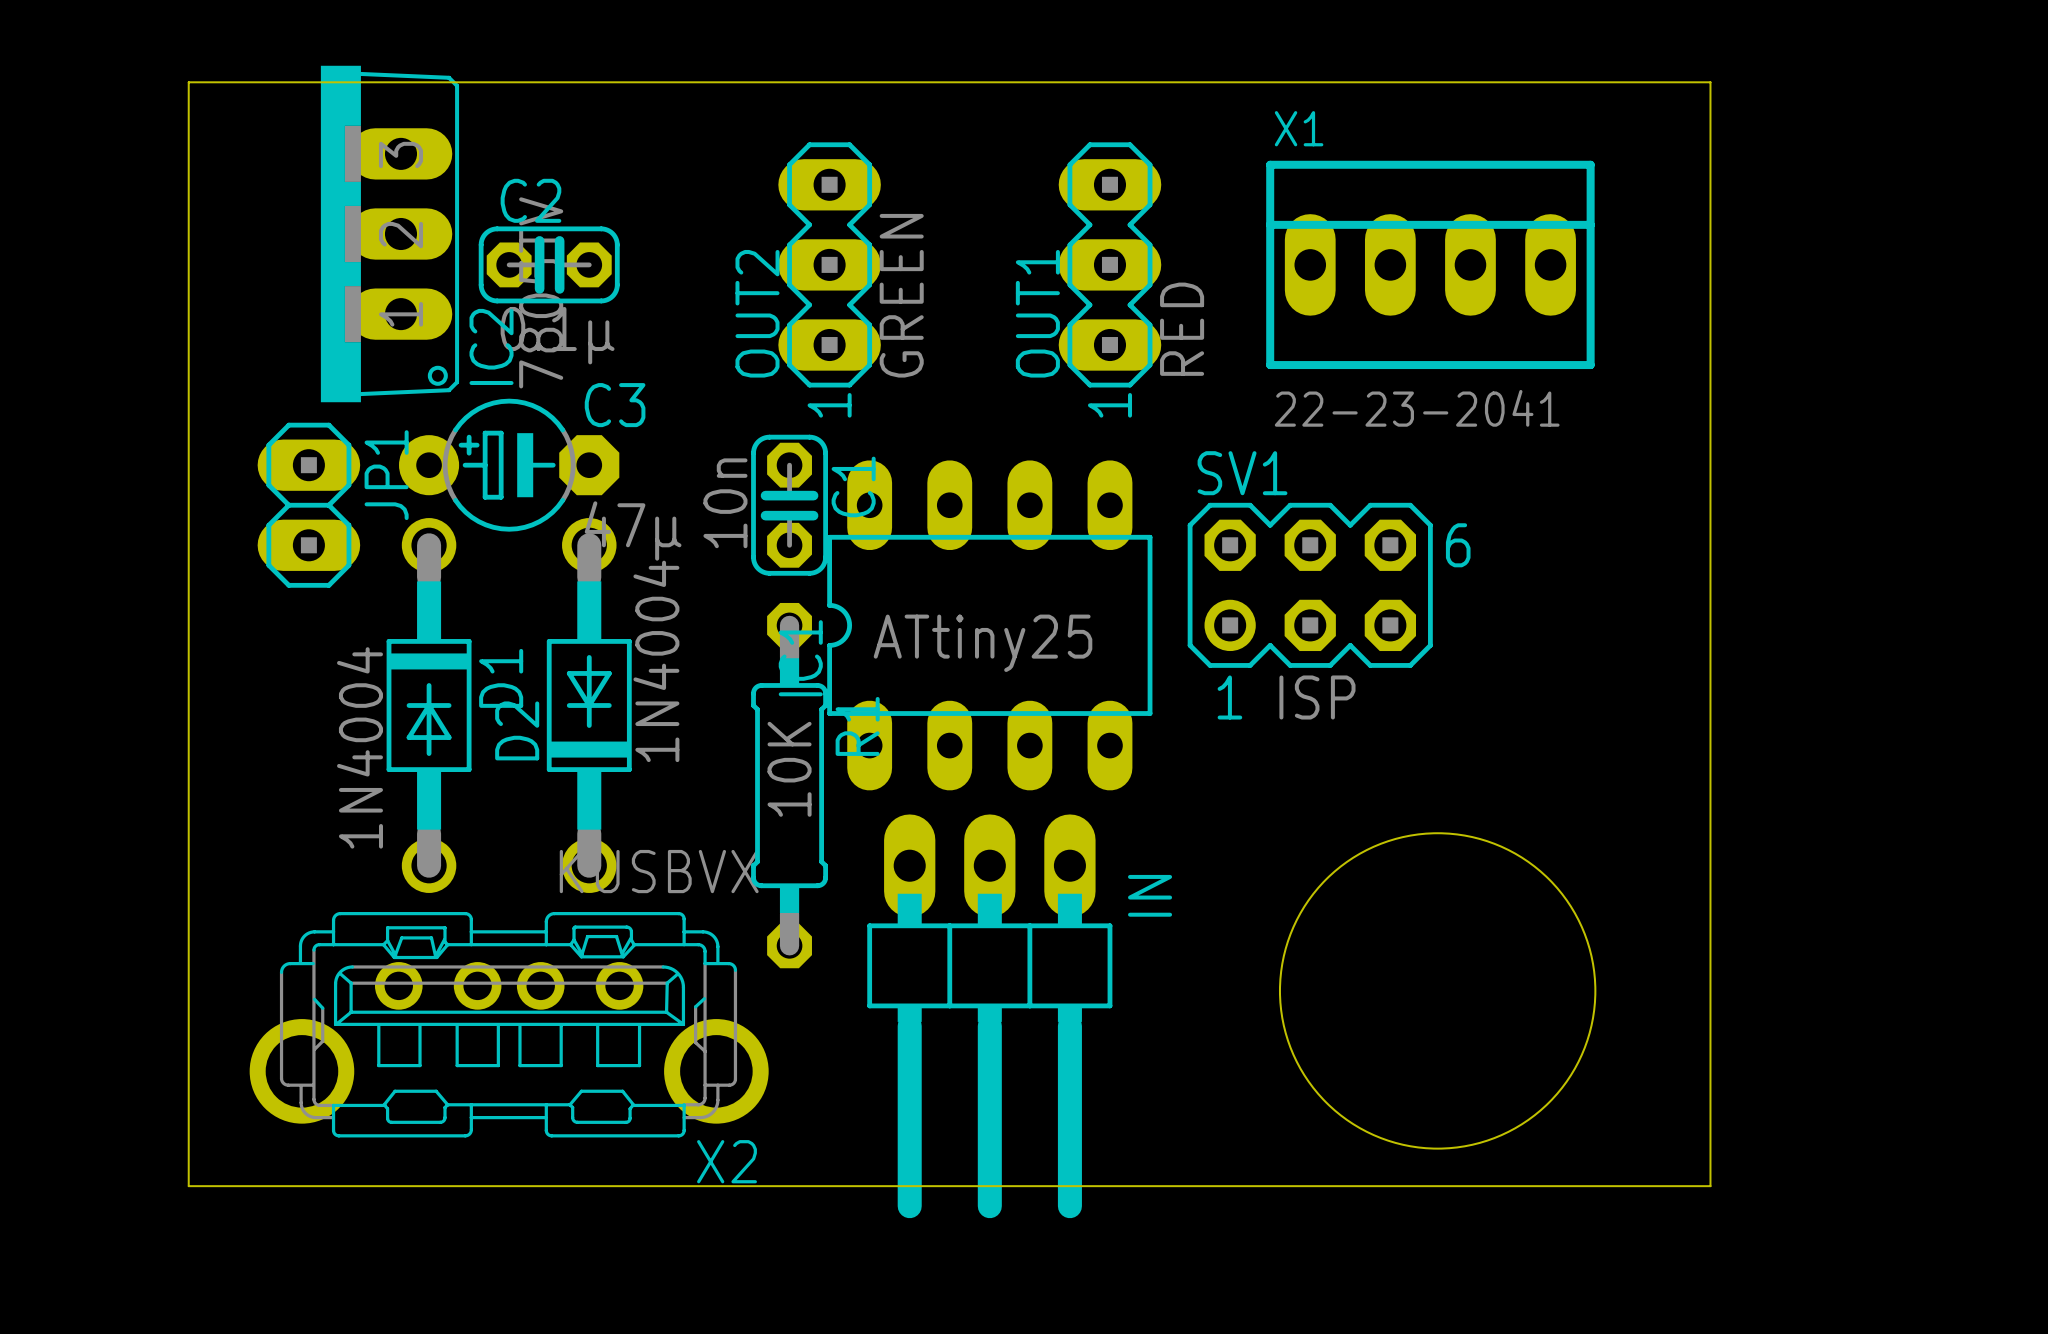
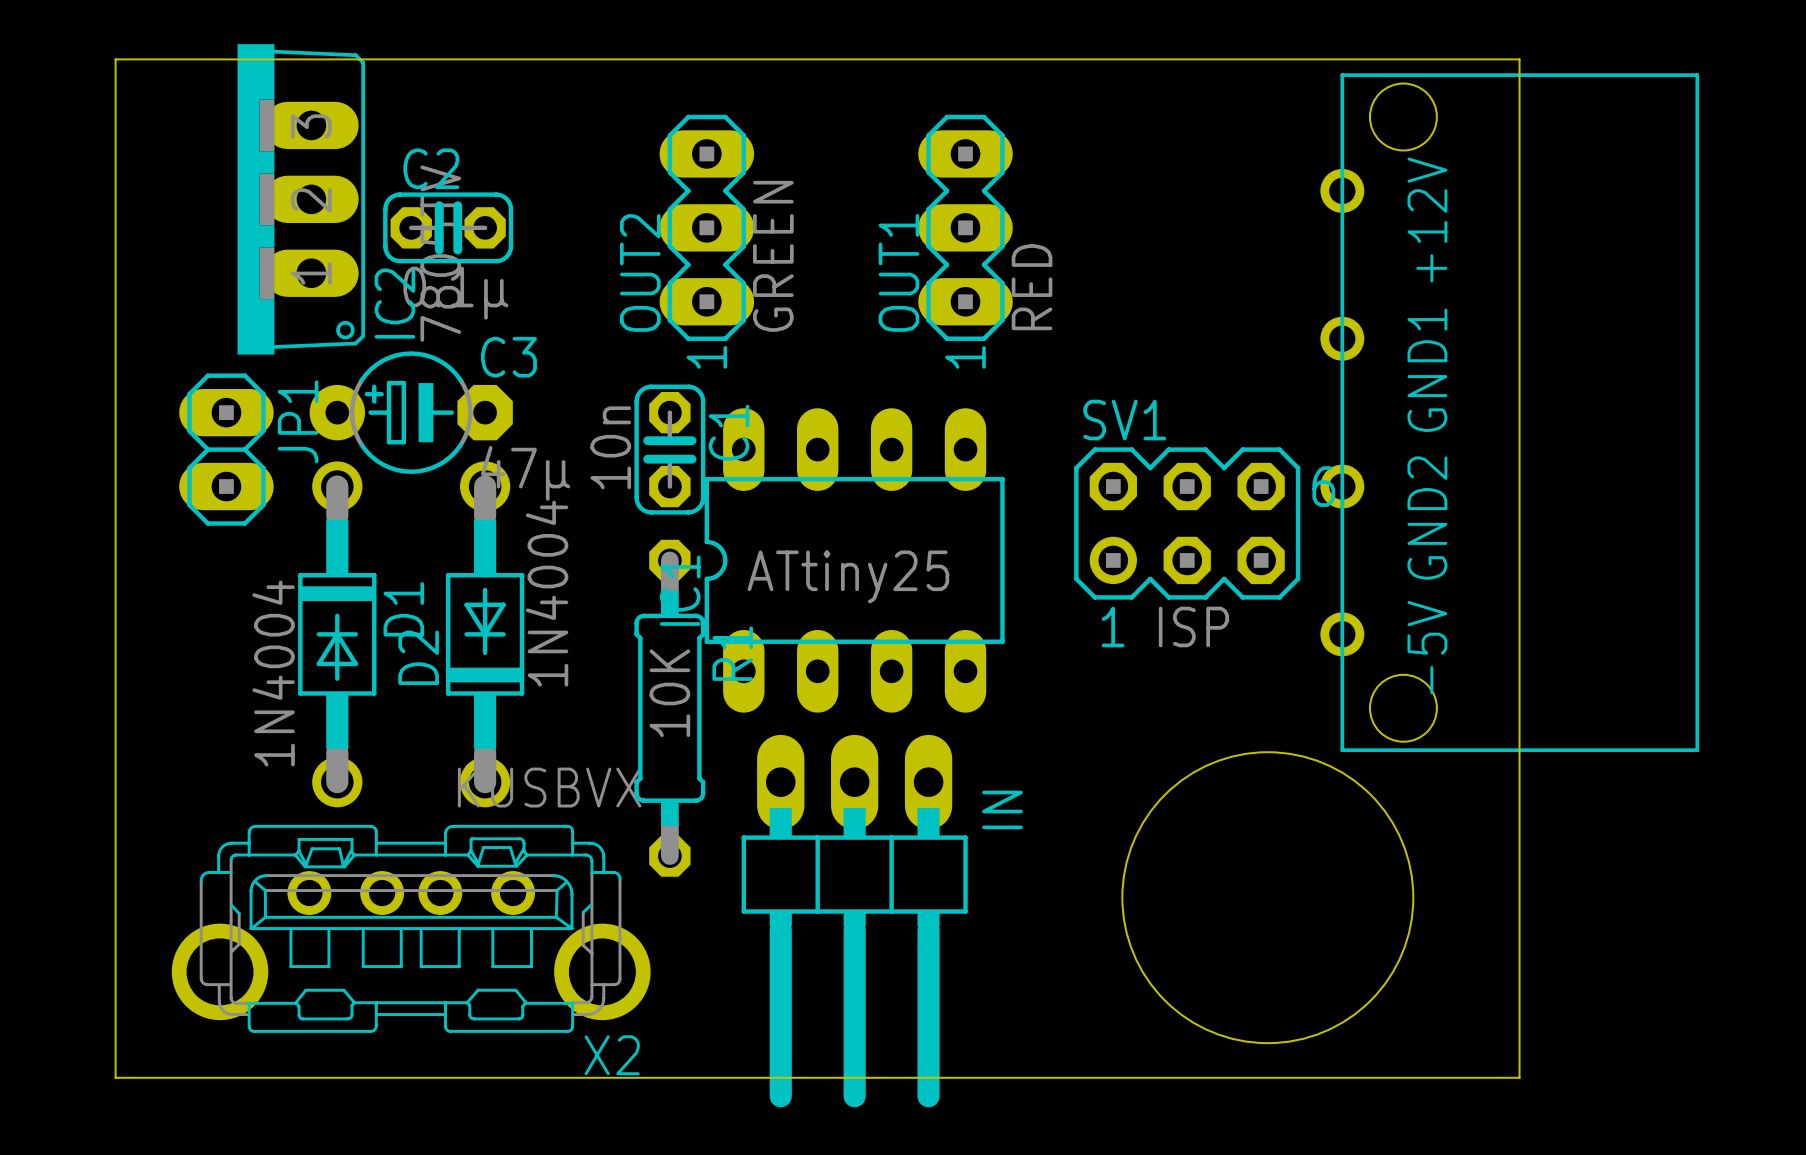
X1: 22-23-2041 (1430, 264) -> none
part: none -> (1509, 412)
SV1 position: (1310, 585) -> (1187, 523)

